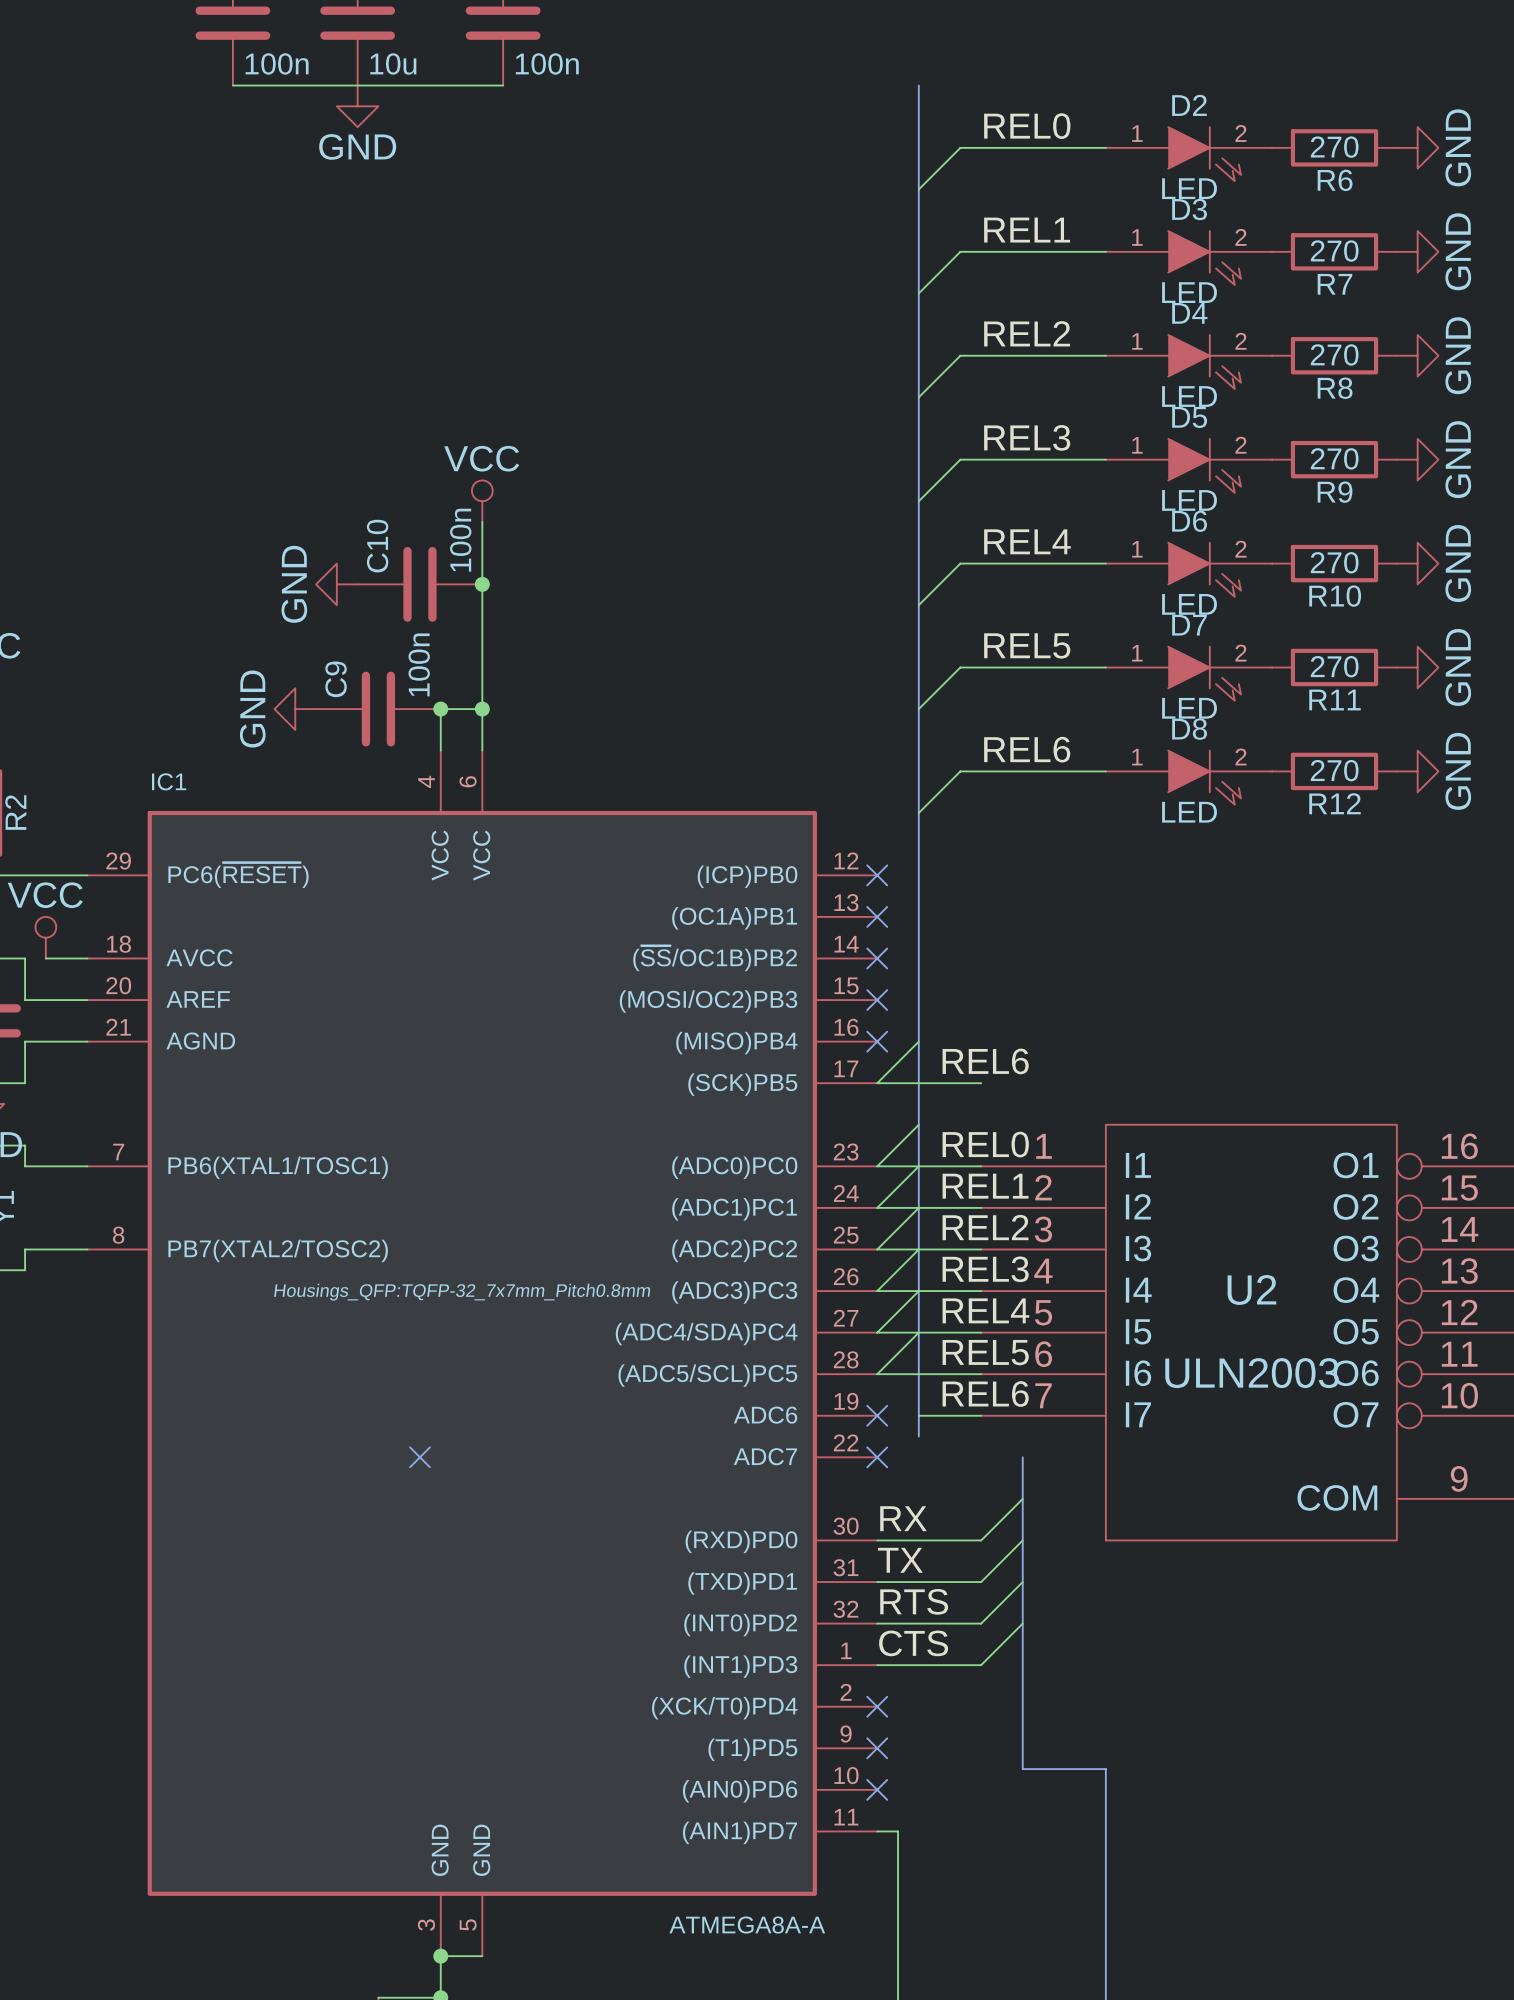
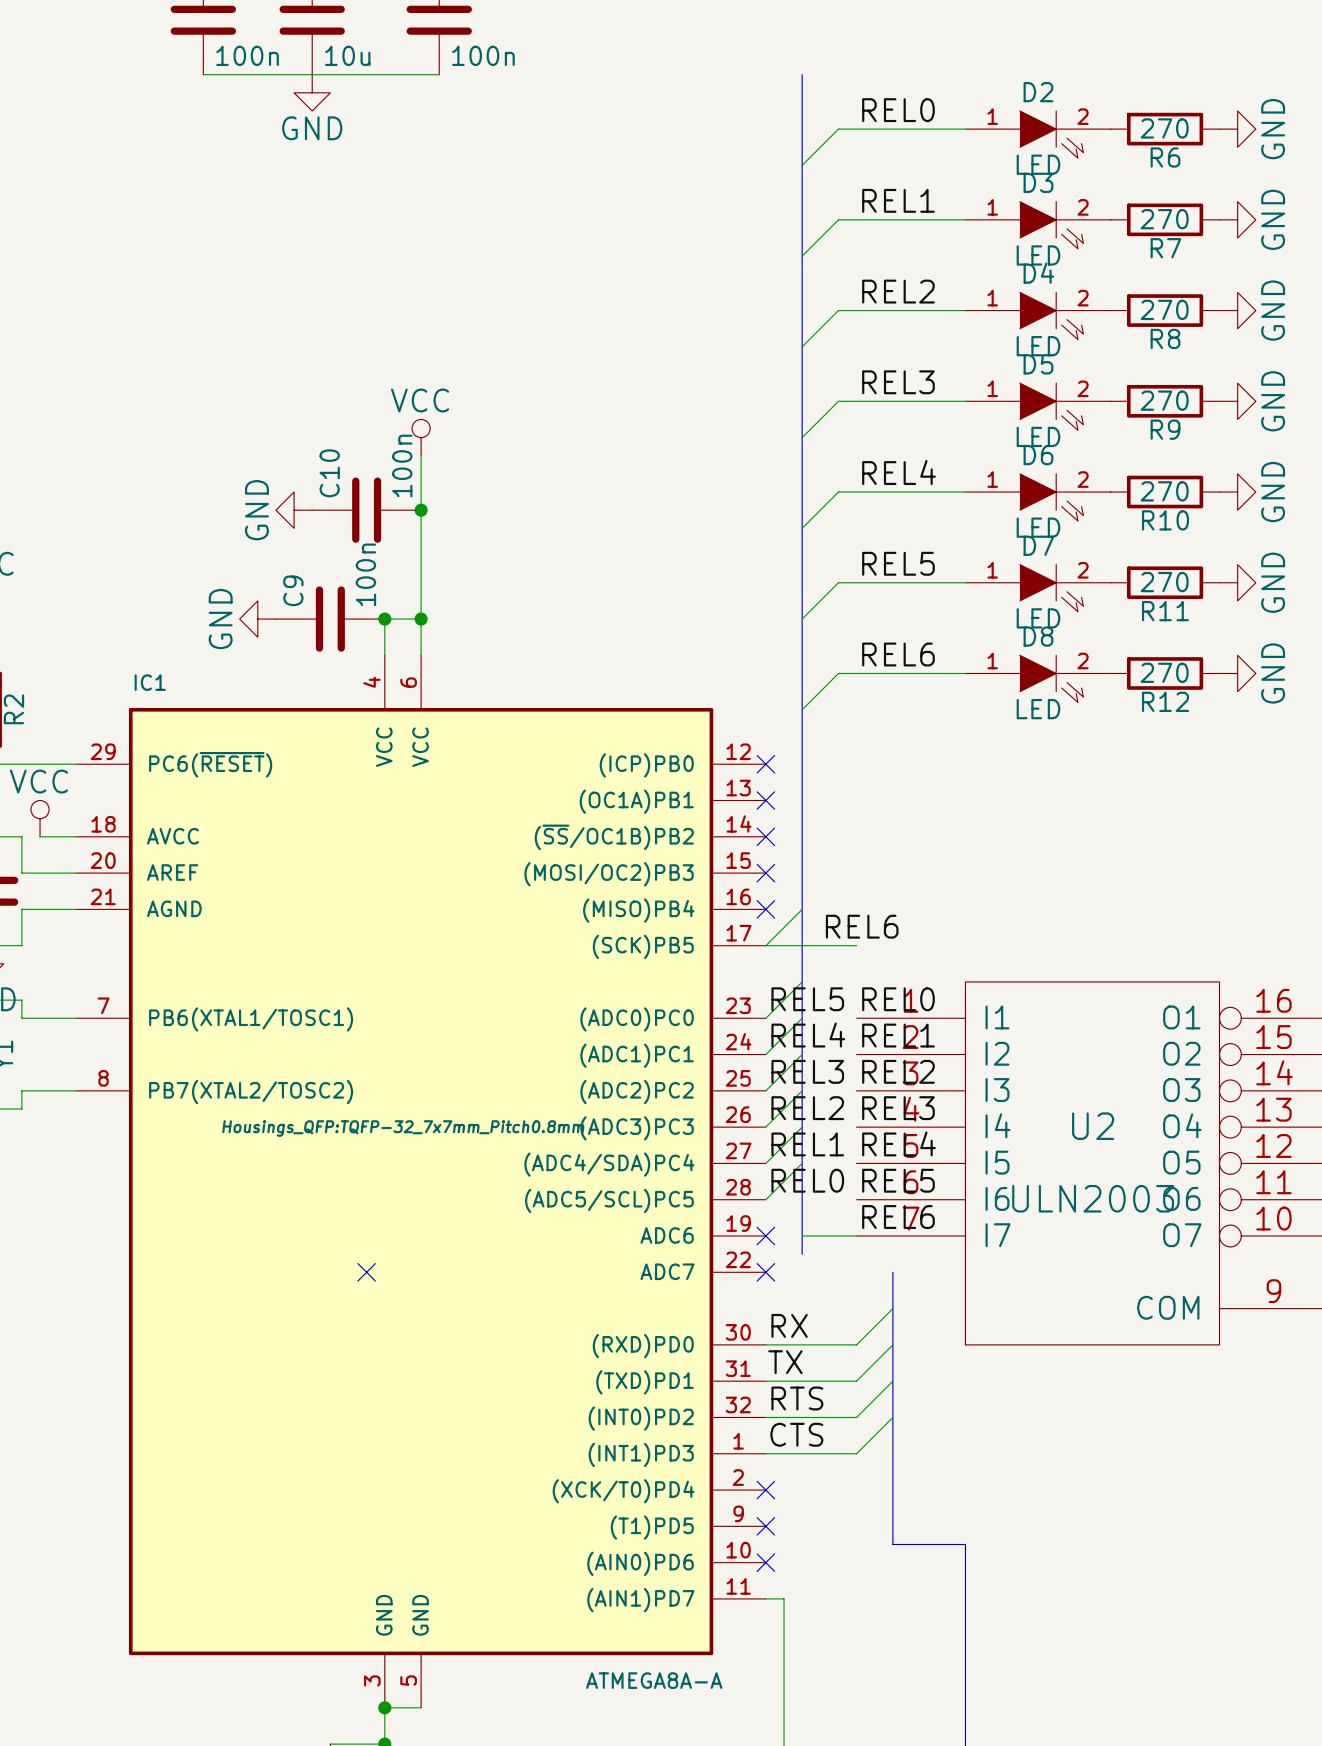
label: none -> REL5 (807, 999)
label position: REL0 (985, 1144) -> REL0 (898, 999)
wire: (877, 1166) (981, 1166) -> none
label: none -> REL4 (808, 1035)
label position: REL1 (985, 1186) -> REL1 (898, 1035)
wire: (877, 1207) (981, 1207) -> none
label: none -> REL3 (807, 1071)
label: REL2 (985, 1227) -> none
label: none -> REL2 (898, 1071)
wire: (877, 1249) (981, 1249) -> none
label: none -> REL2 (807, 1108)
label: REL3 (985, 1269) -> none
label: none -> REL3 (898, 1108)
wire: (877, 1291) (981, 1291) -> none
label: none -> REL1 (807, 1144)
label position: REL4 (985, 1310) -> REL4 (898, 1143)
wire: (877, 1332) (981, 1332) -> none
label: none -> REL0 (807, 1180)
label position: REL5 (985, 1352) -> REL5 (898, 1180)
wire: (877, 1374) (981, 1374) -> none
label position: REL6 (985, 1393) -> REL6 (898, 1217)

